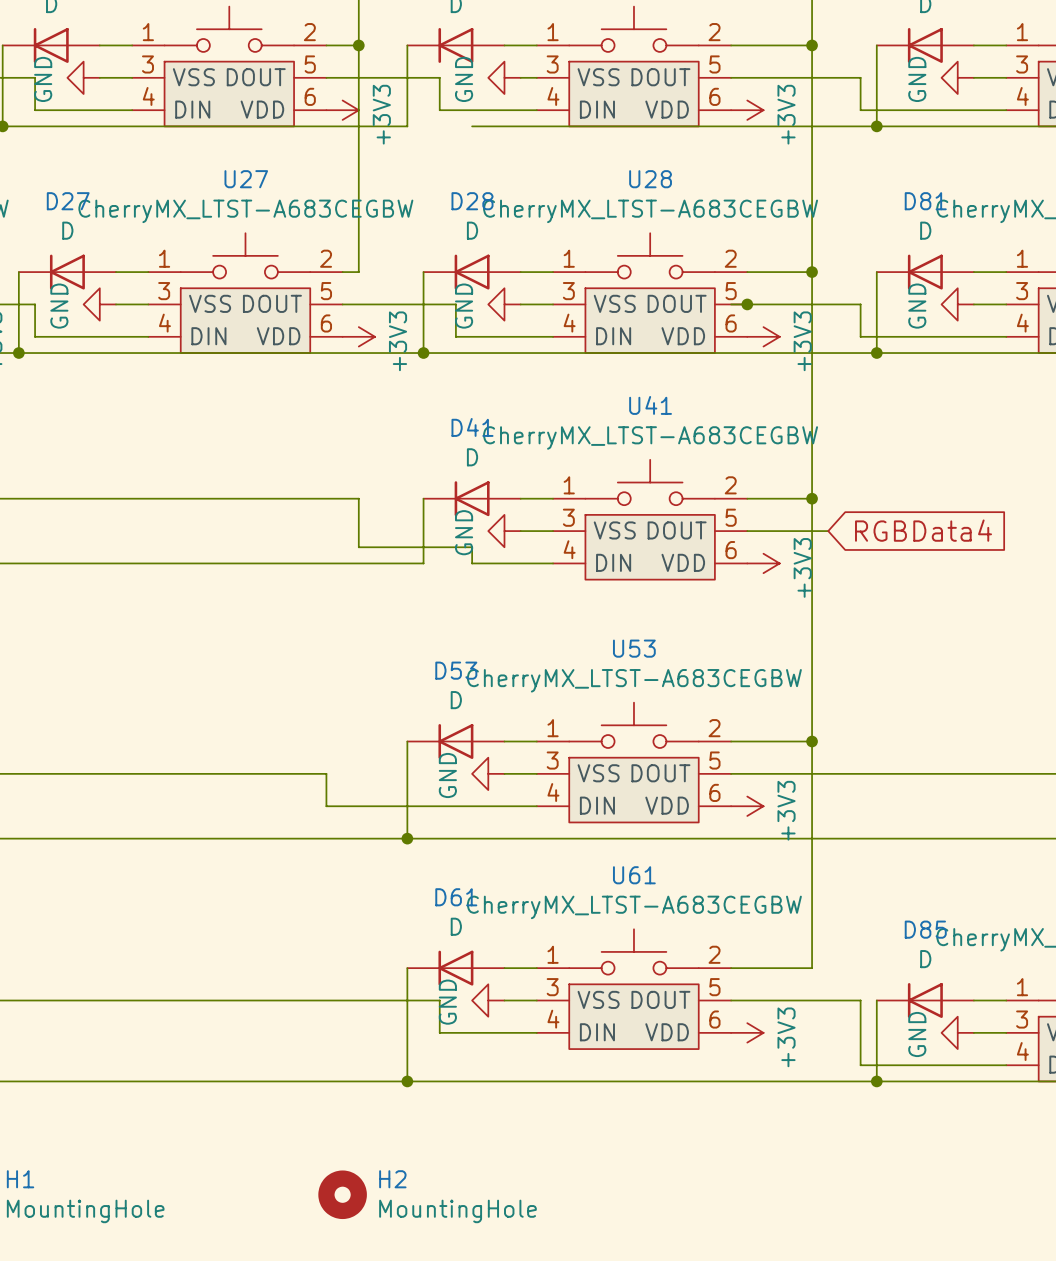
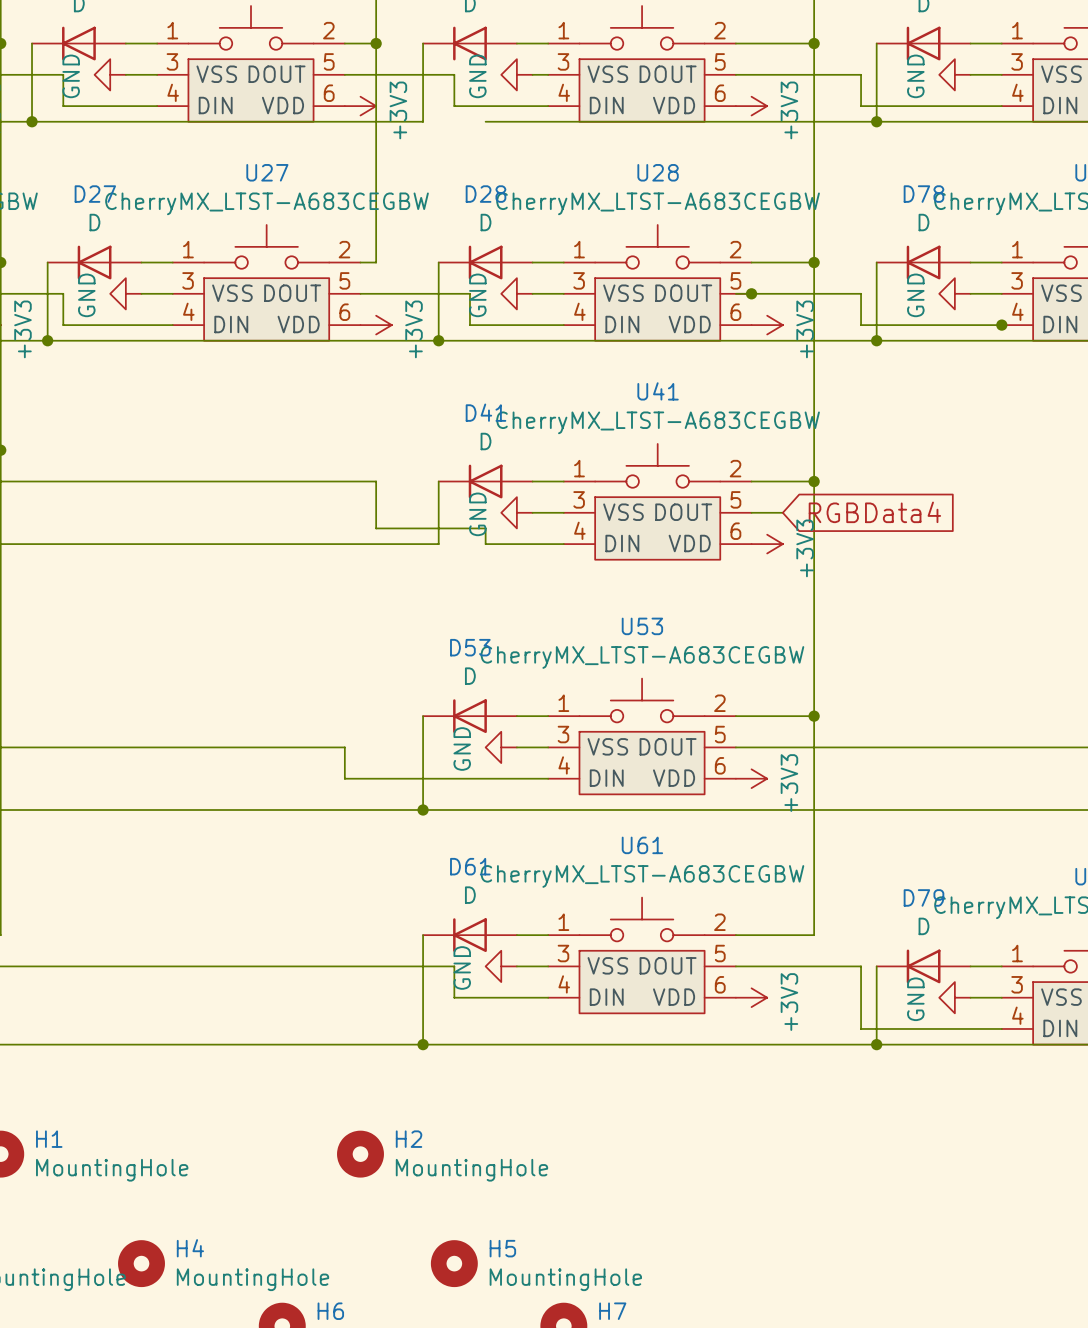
D81 name: D81 (925, 201) -> D78 (923, 194)
junction: none -> (1001, 325)
global label position: RGBData4 (923, 530) -> RGBData4 (874, 512)
wire: (779, 531) (828, 531) -> none
D85 name: D85 (925, 929) -> D79 (923, 897)

